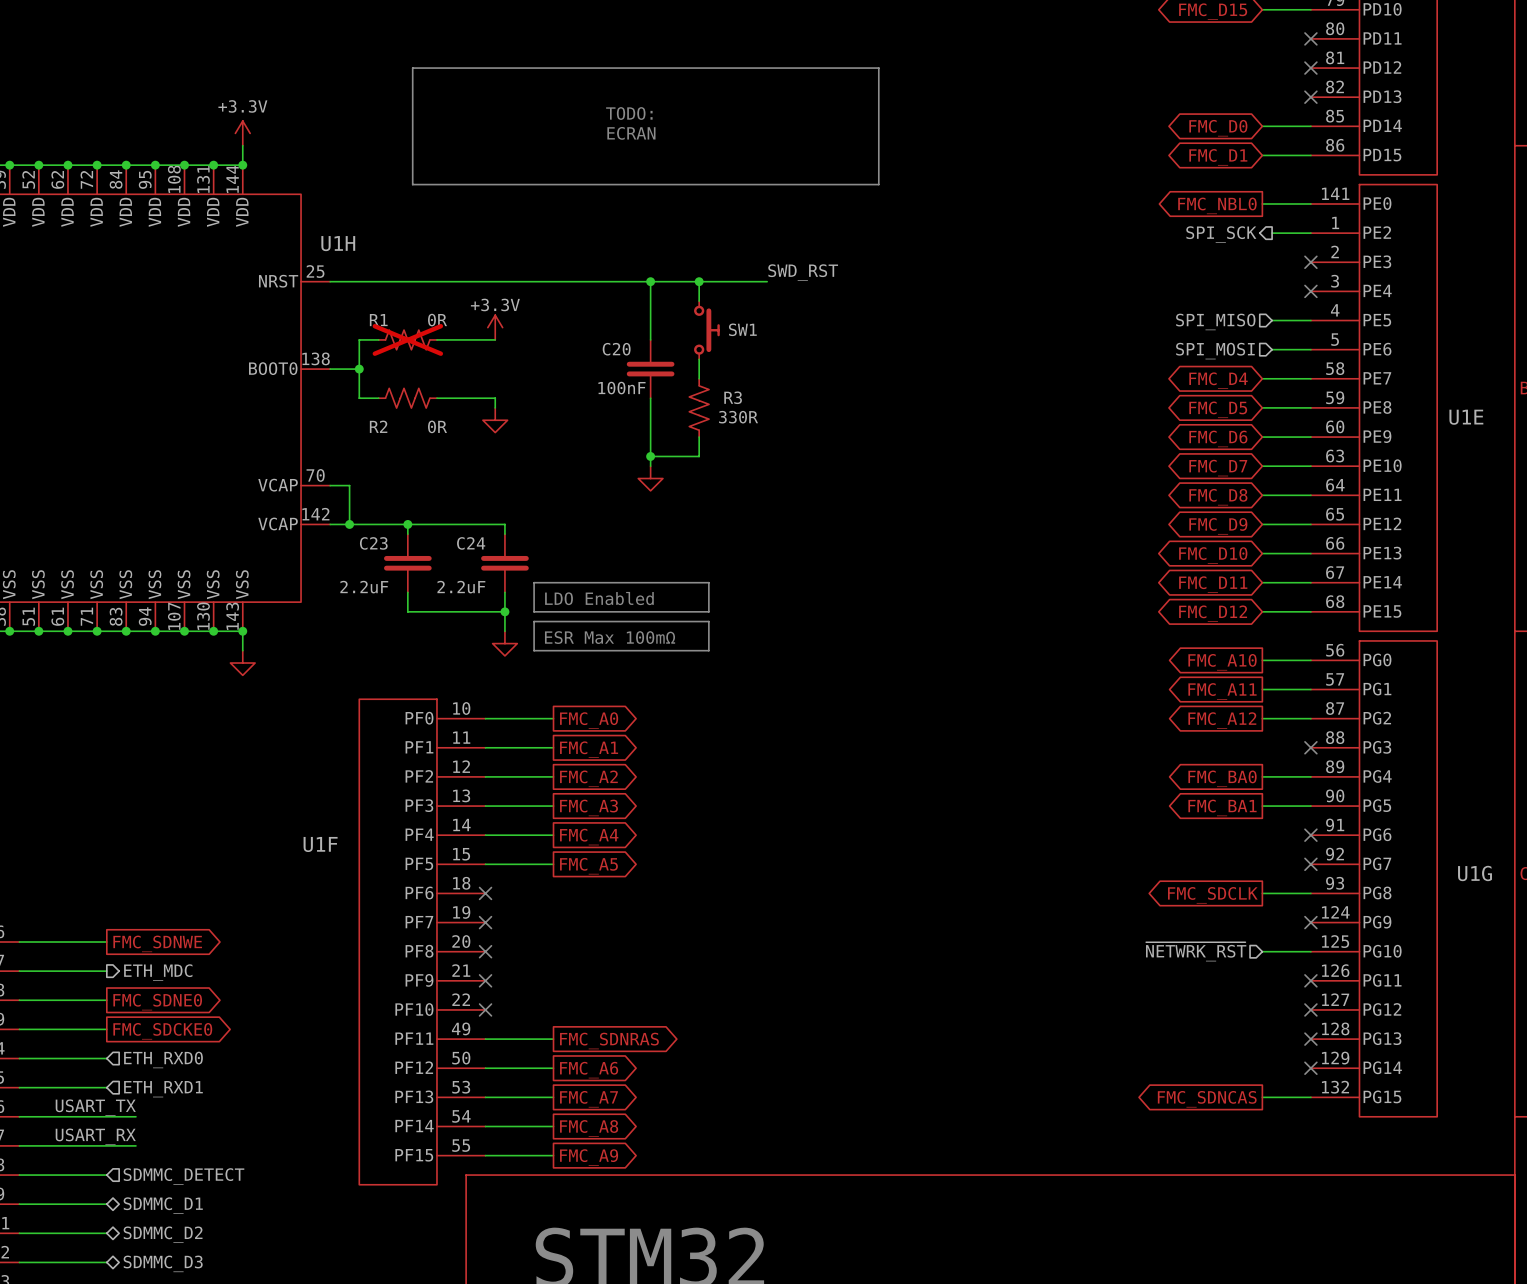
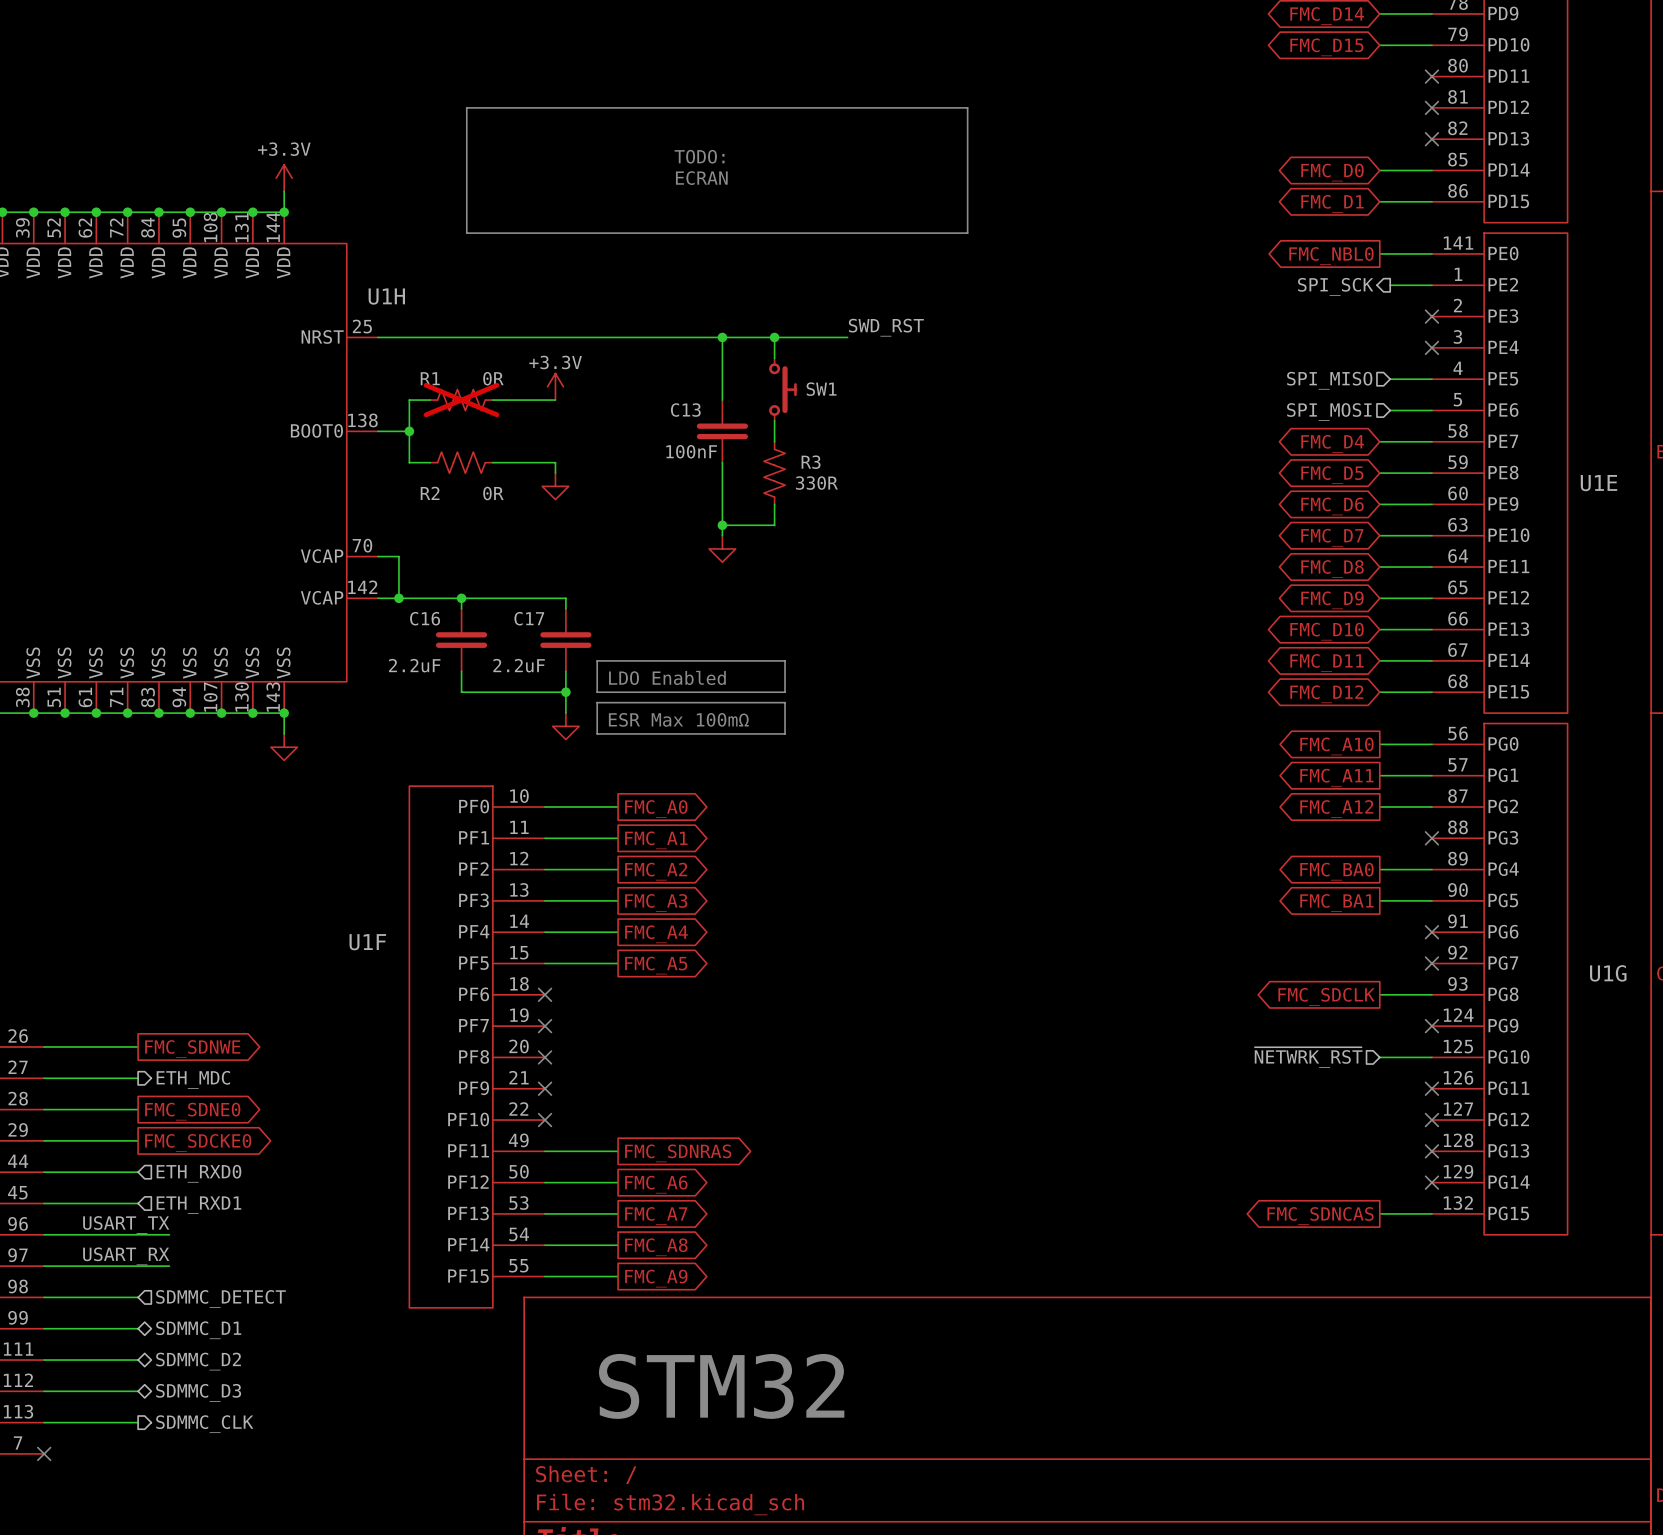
C20 name: C20 (616, 349) -> C13 (685, 410)
C23 name: C23 (373, 543) -> C16 (425, 618)
C24 name: C24 (471, 543) -> C17 (529, 618)

